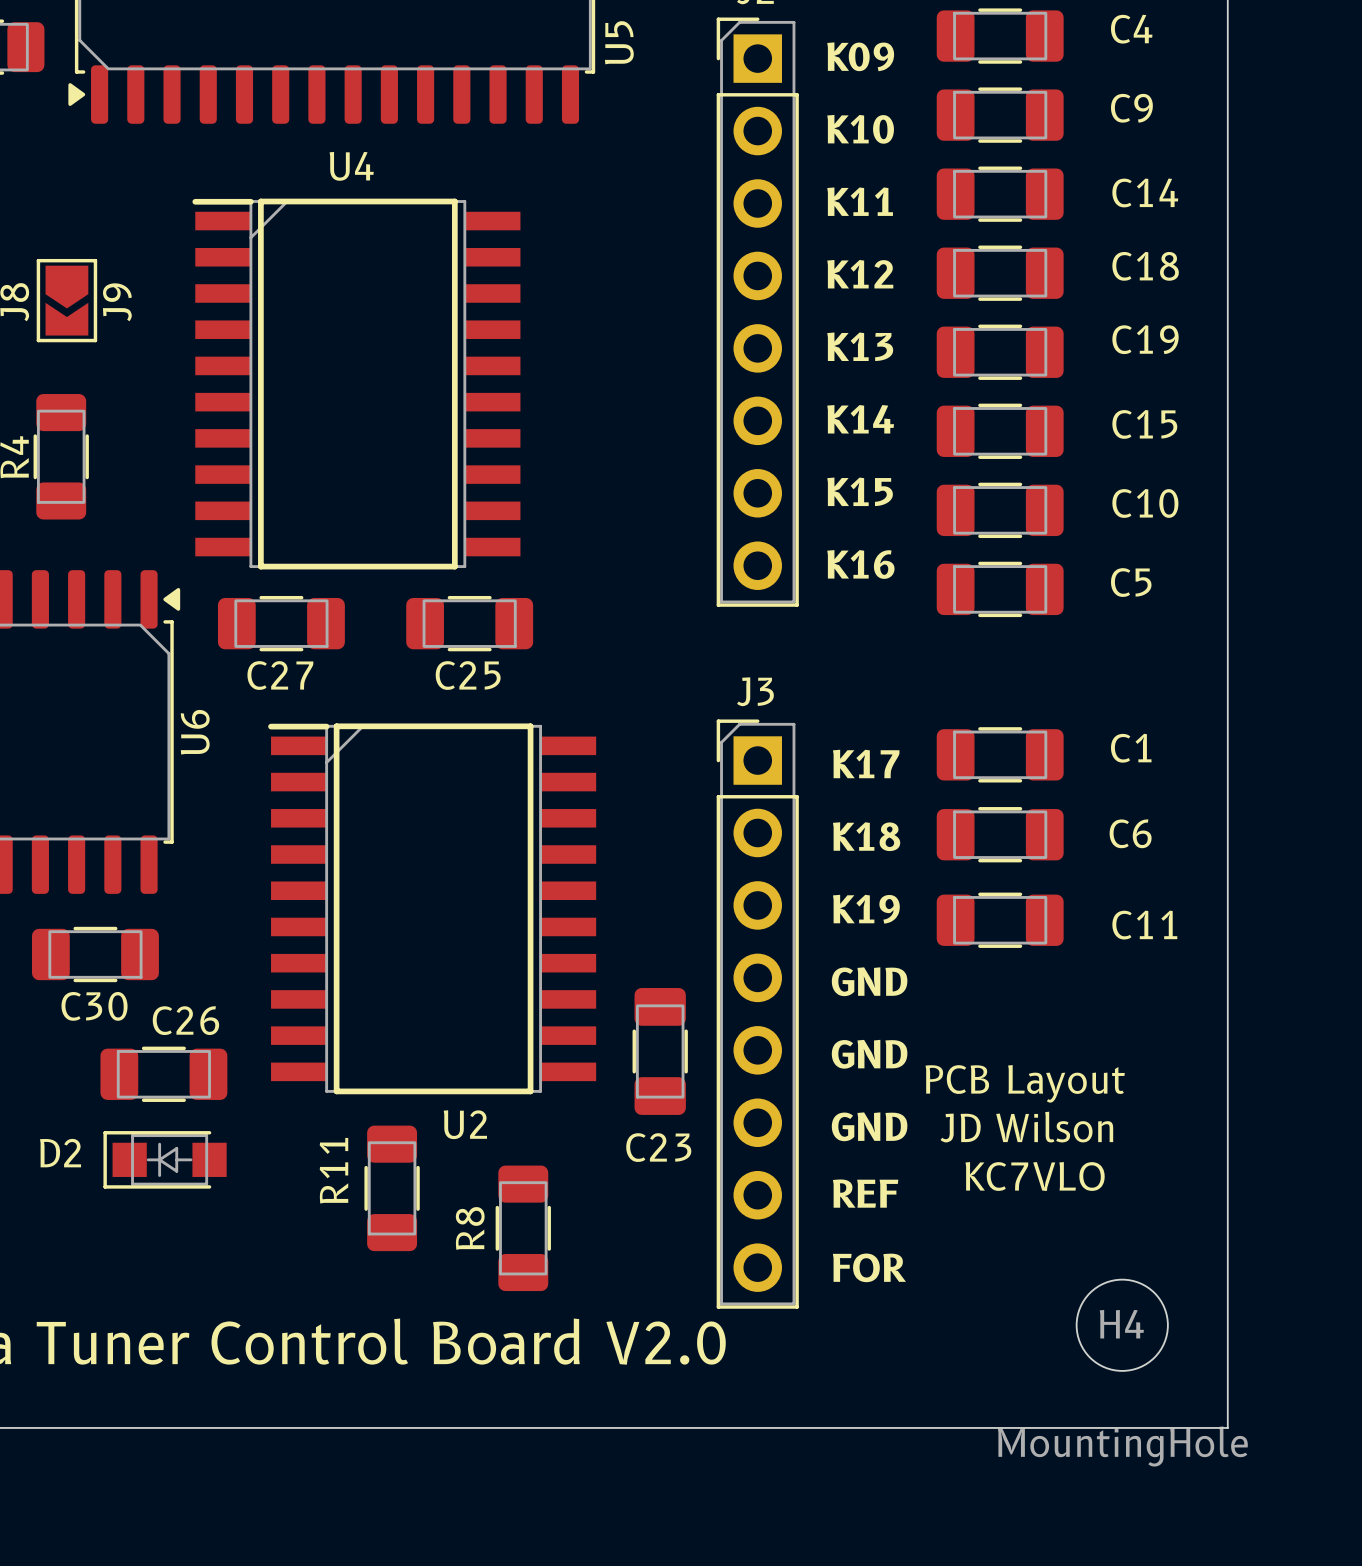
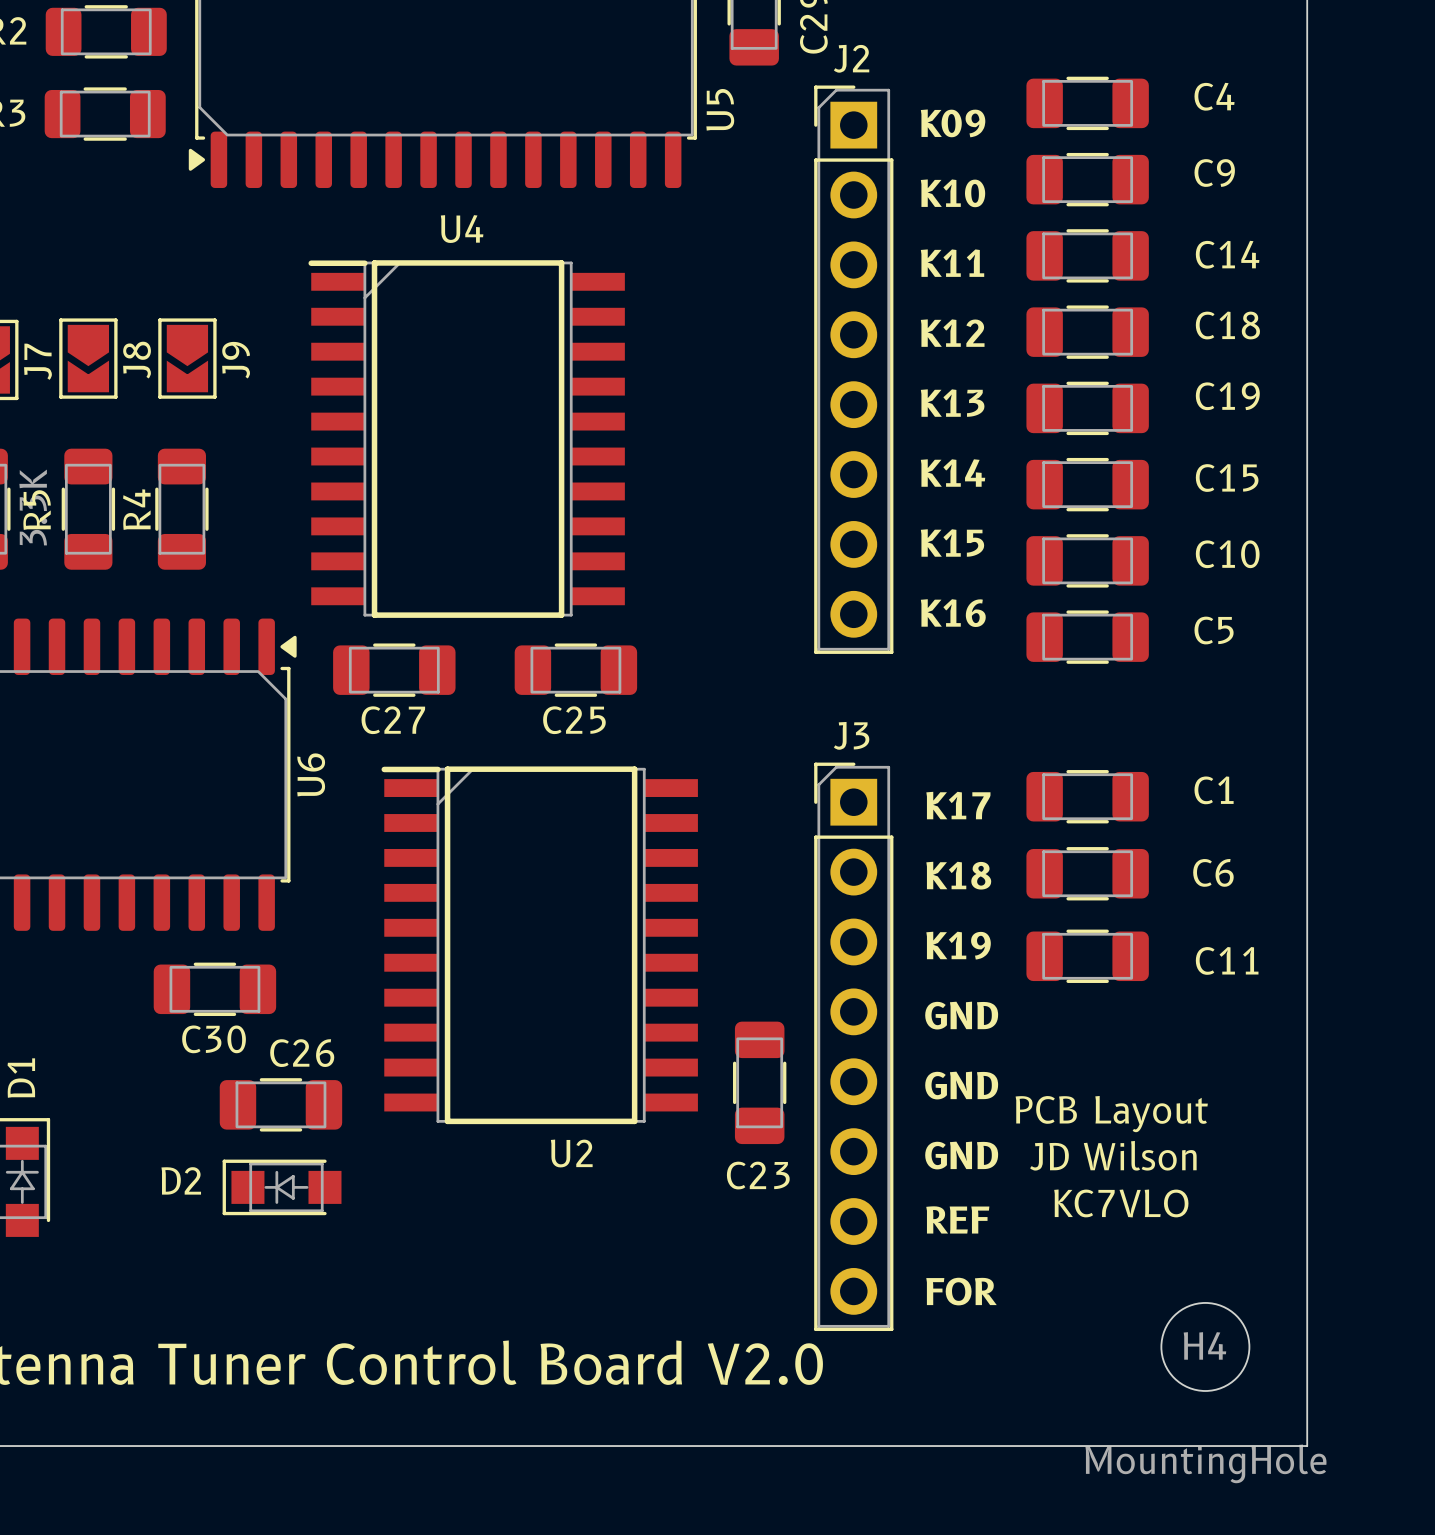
R11: (392, 1188) -> none
R8: (523, 1228) -> none

